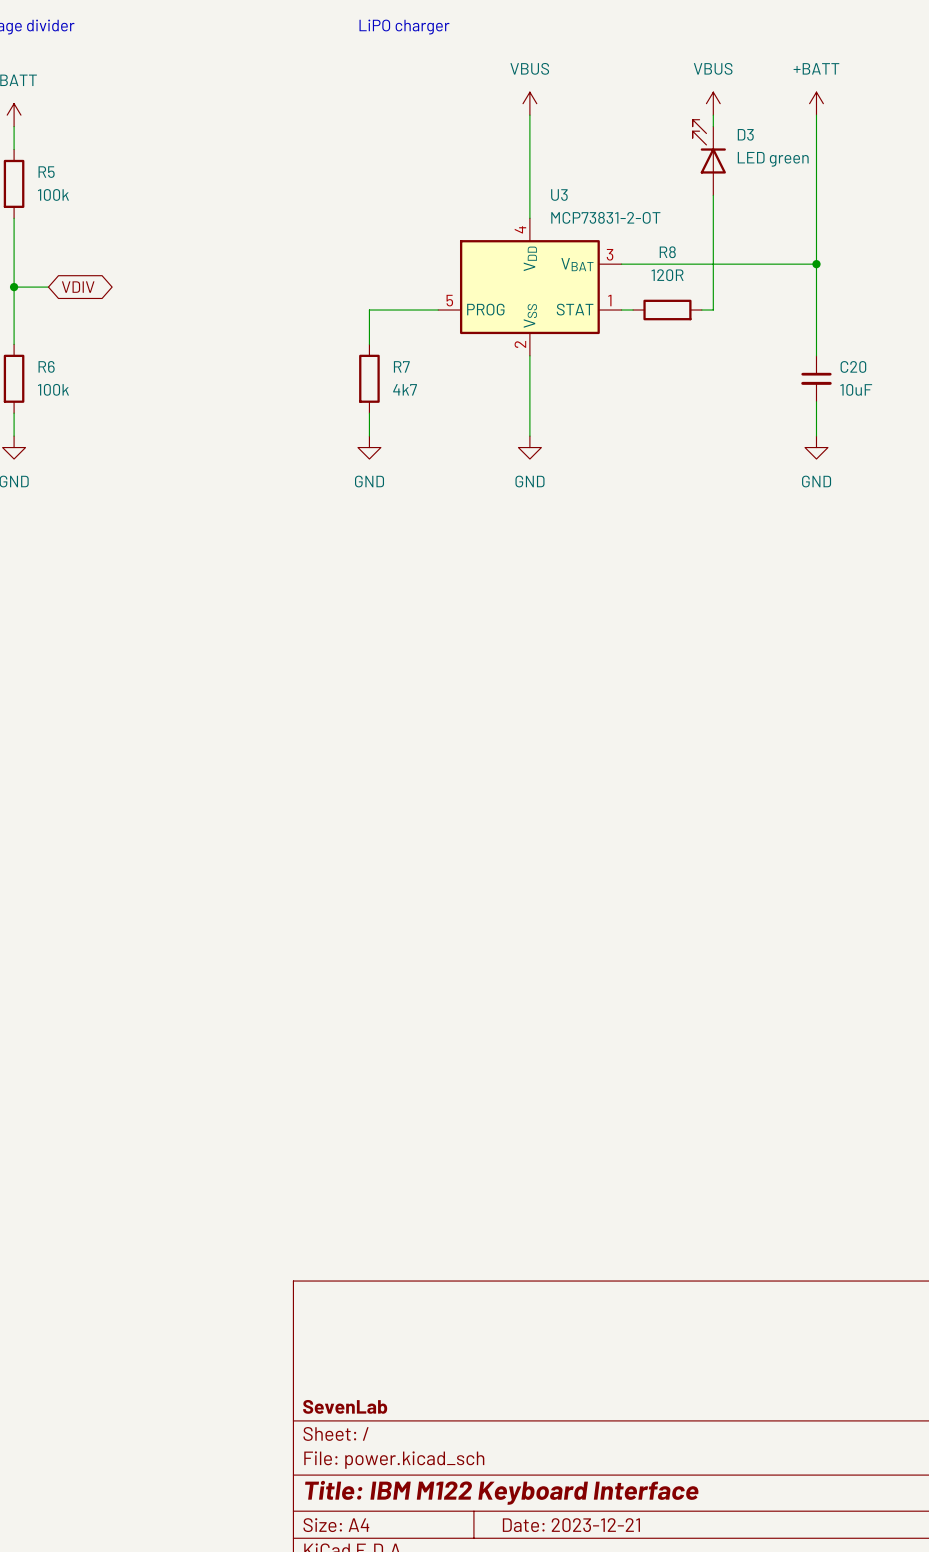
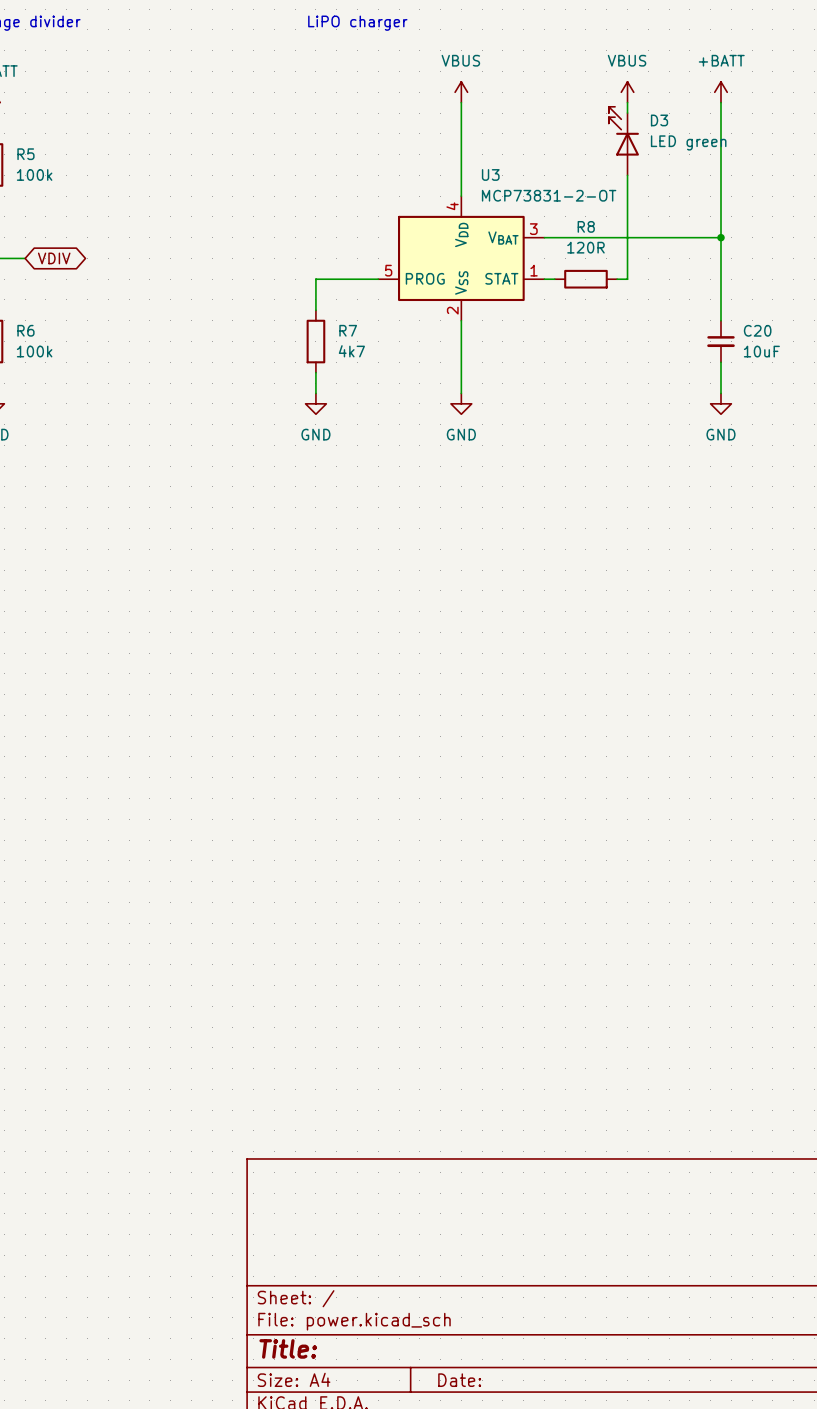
title block: SevenLab (345, 1406) -> none
title block: Title: IBM M122 Keyboard Interface (501, 1492) -> Title: (288, 1348)
title block: Date: 2023-12-21 (571, 1525) -> Date: (459, 1380)

